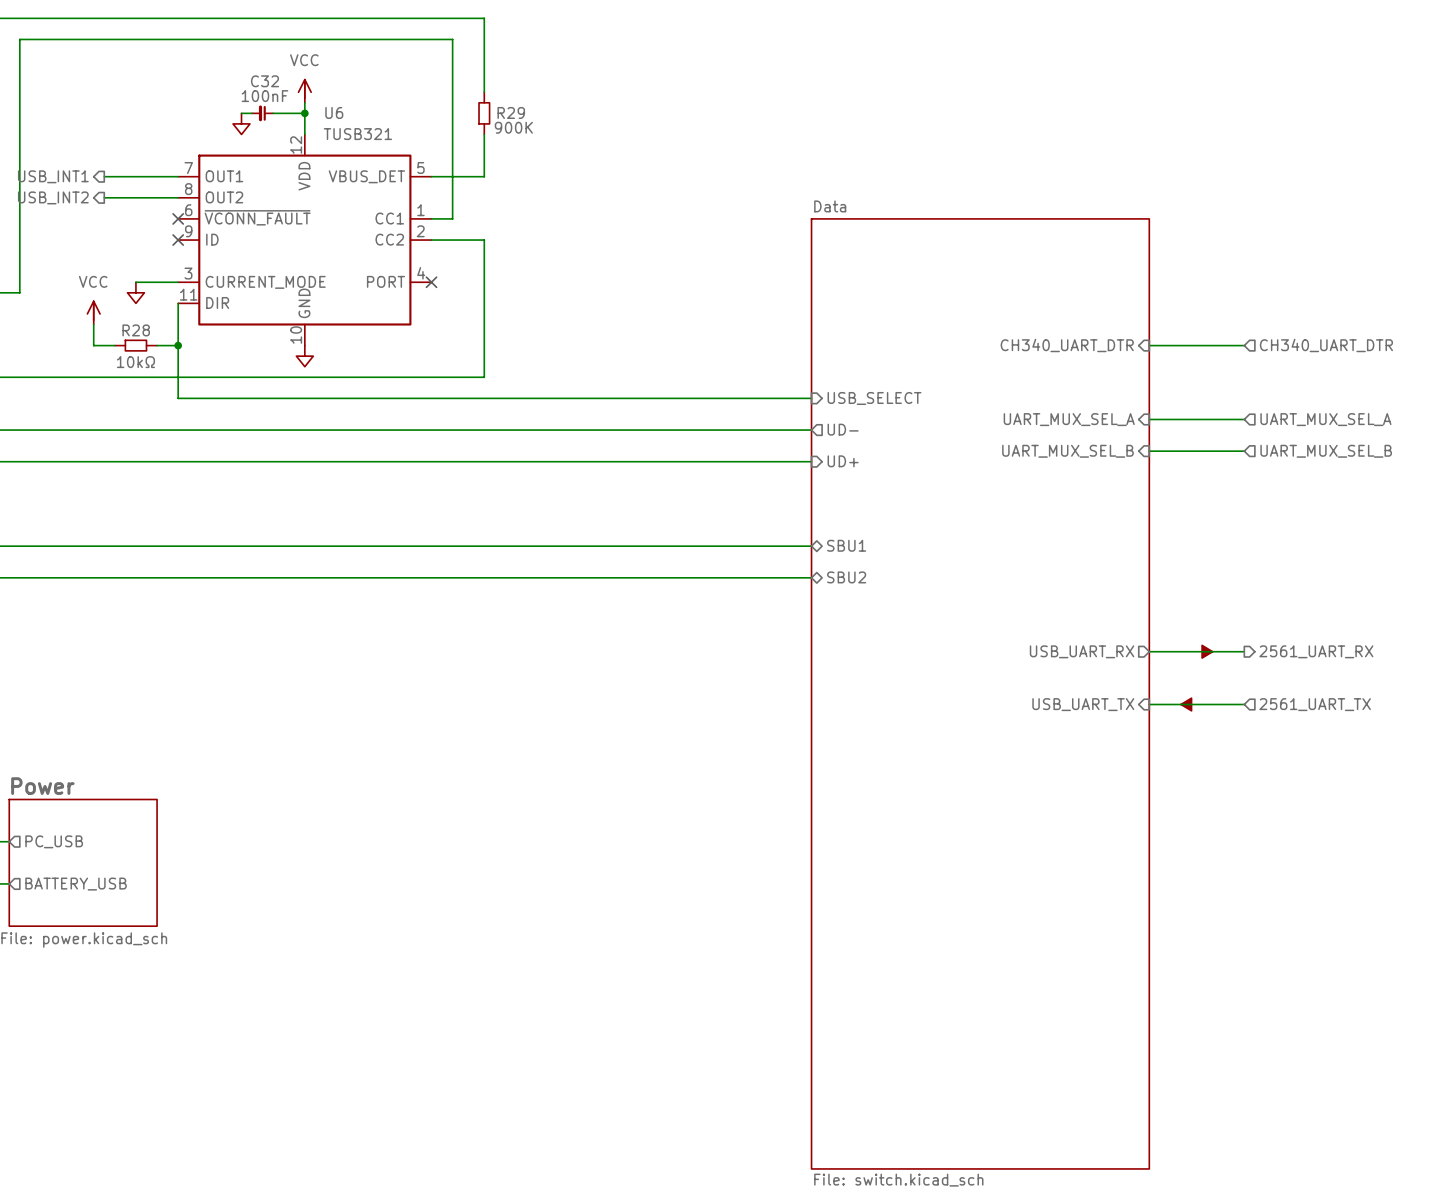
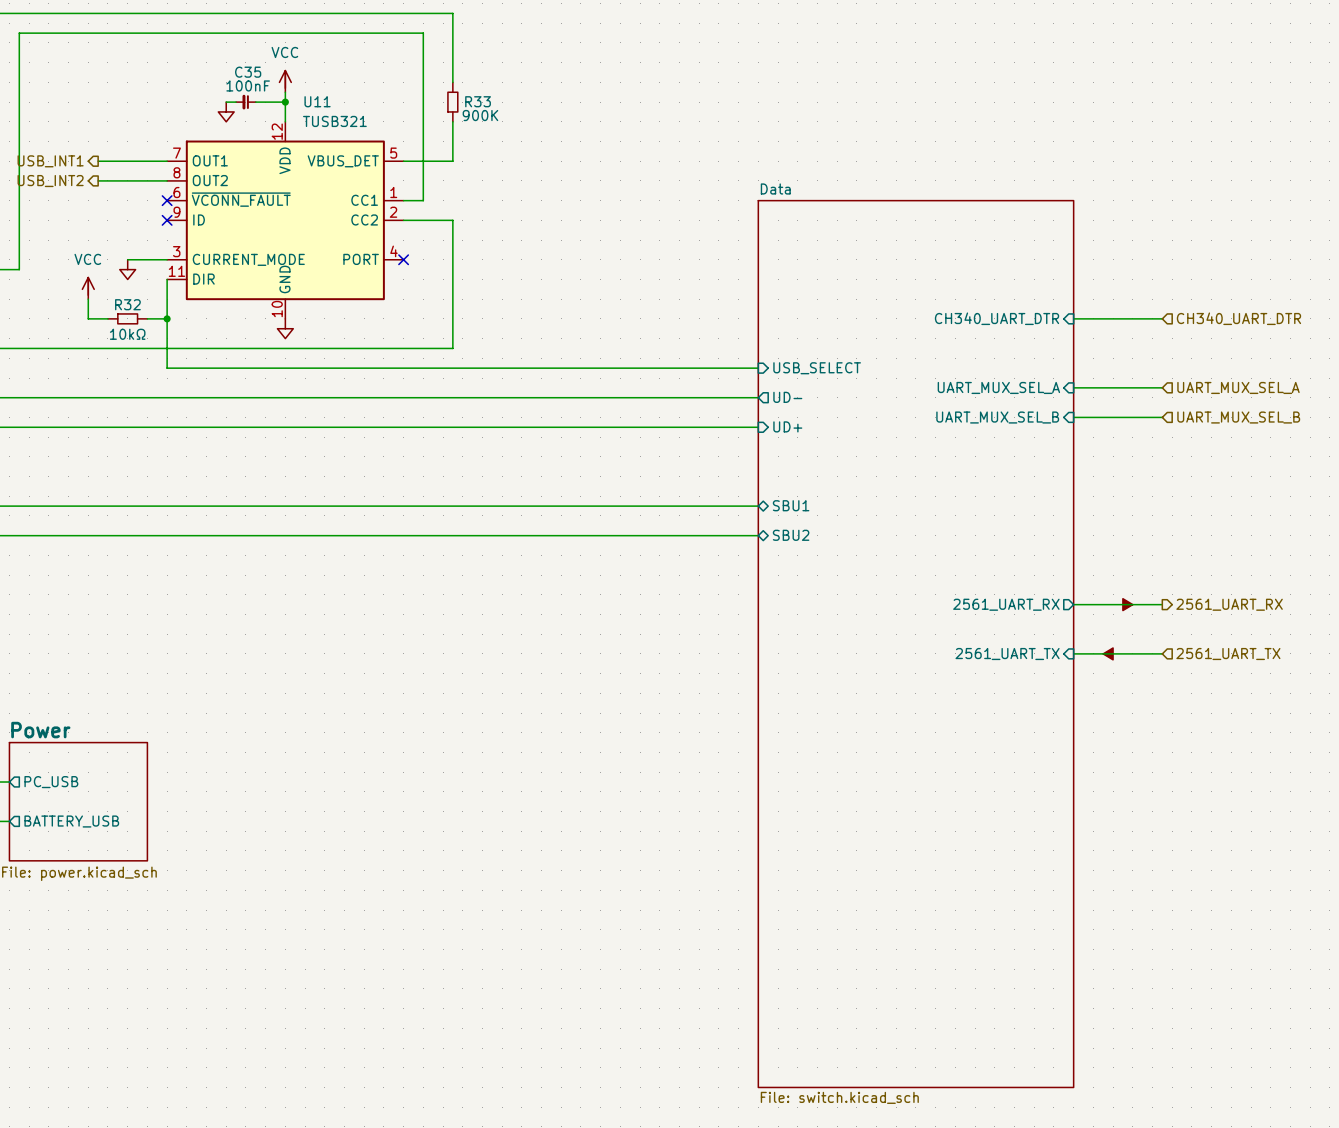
C32 name: C32 (264, 81) -> C35 (248, 72)
U6 name: U6 (334, 112) -> U11 (317, 101)
R29 name: R29 (511, 112) -> R33 (478, 101)
R28 name: R28 (136, 330) -> R32 (127, 304)
sheet pin: USB_UART_RX (1082, 651) -> 2561_UART_RX (1006, 604)
sheet pin: USB_UART_TX (1083, 704) -> 2561_UART_TX (1007, 654)

